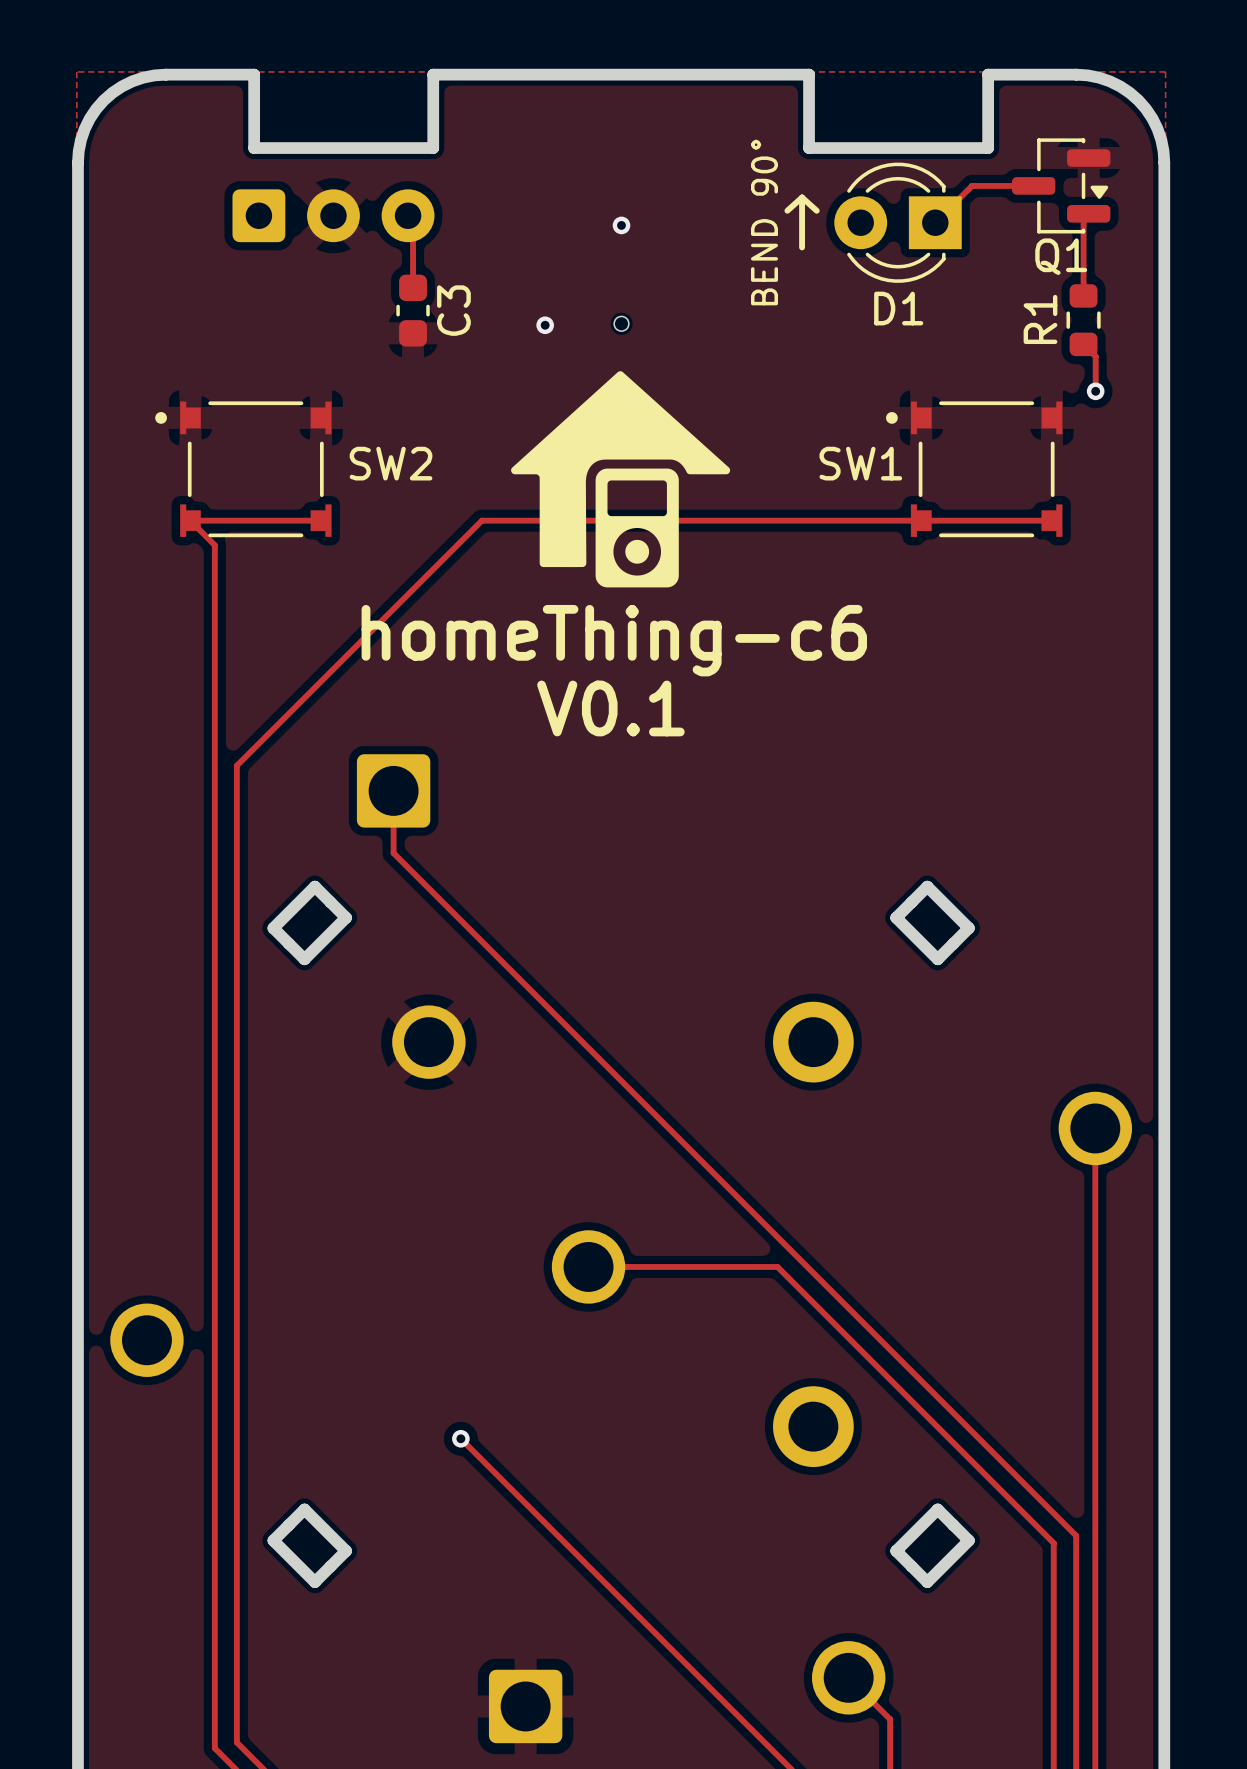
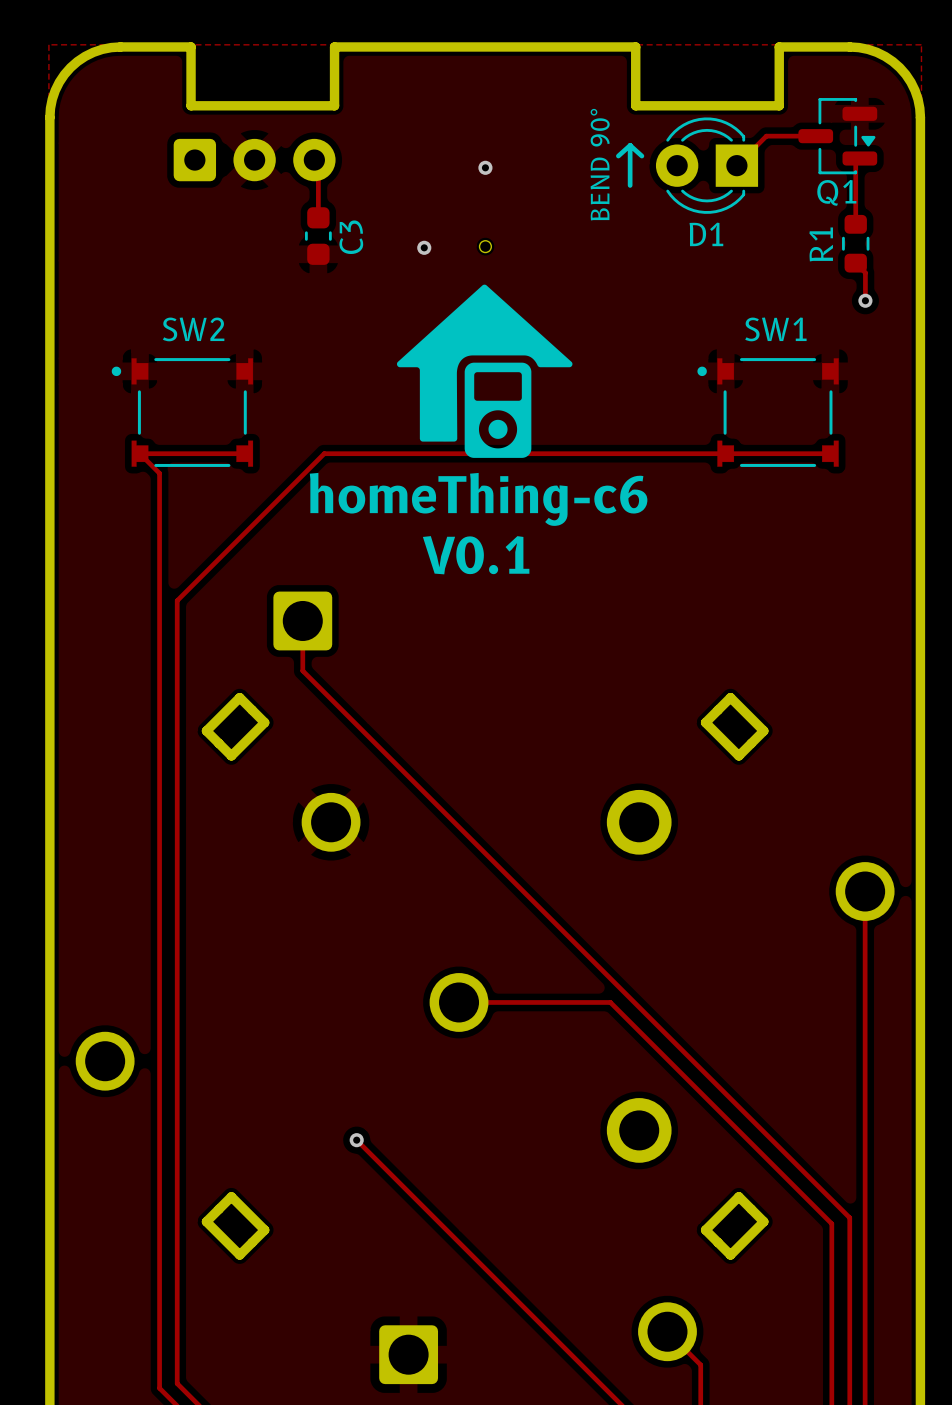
SW2 name position: SW2 (391, 463) -> SW2 (193, 329)
SW1 name position: SW1 (860, 463) -> SW1 (775, 329)
SW2 position: (243, 469) -> (182, 412)
SW1 position: (974, 469) -> (768, 412)
track: (321, 520) (190, 520) (214, 545) (214, 606) -> (244, 453) (139, 453) (159, 473)
track: (1052, 520) (481, 520) (420, 582) -> (830, 453) (324, 453)

